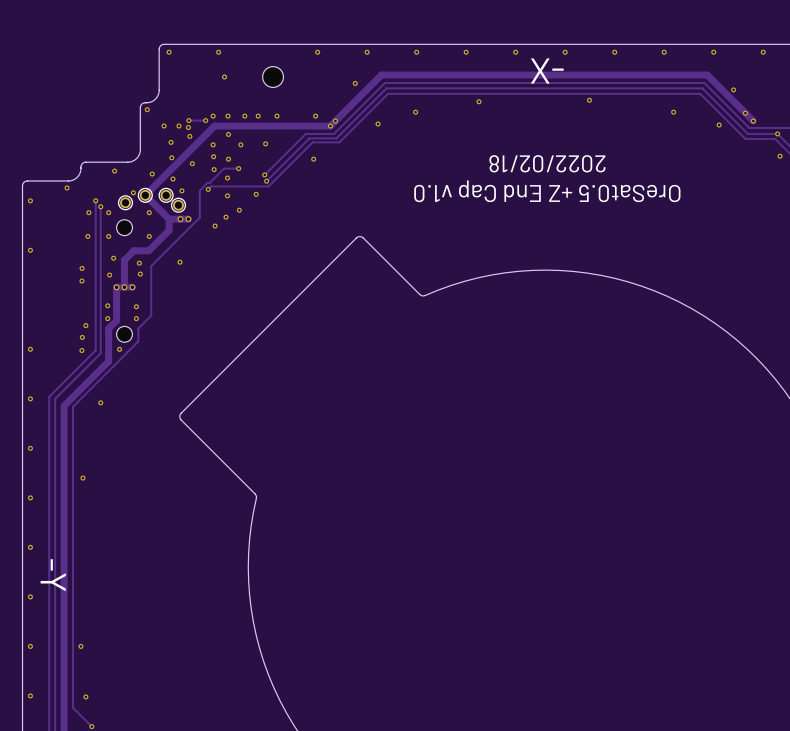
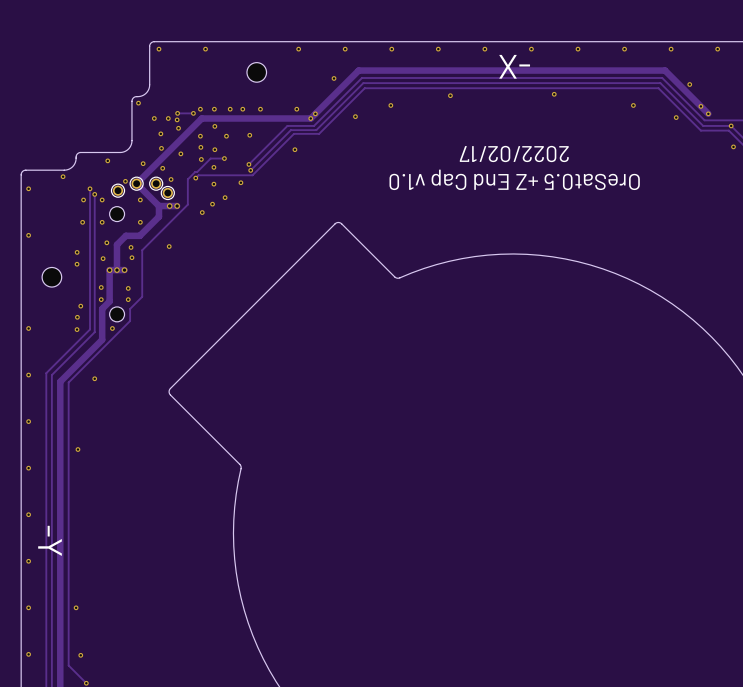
via: (224, 77) -> none
text: 2022/02/18 (547, 163) -> 2022/02/17 (514, 154)
part: none -> (51, 277)

